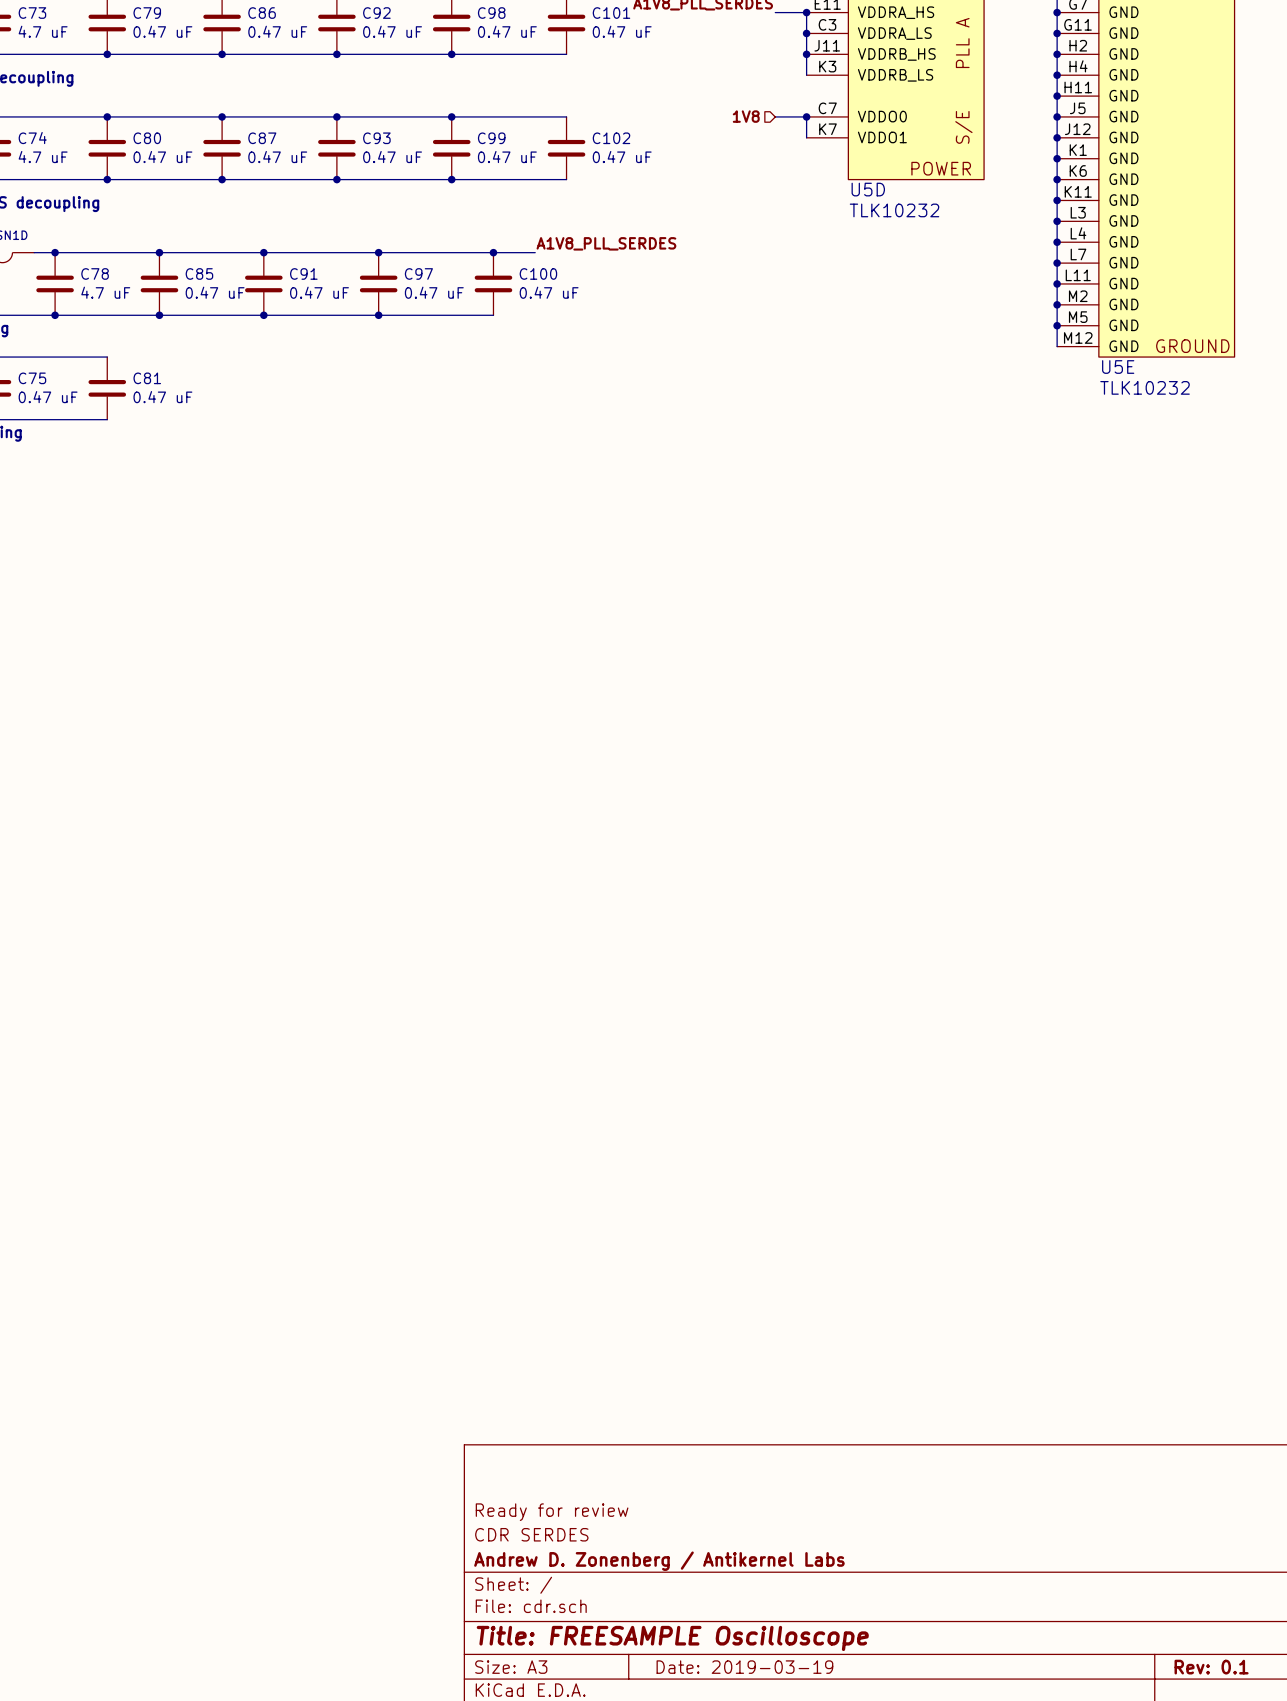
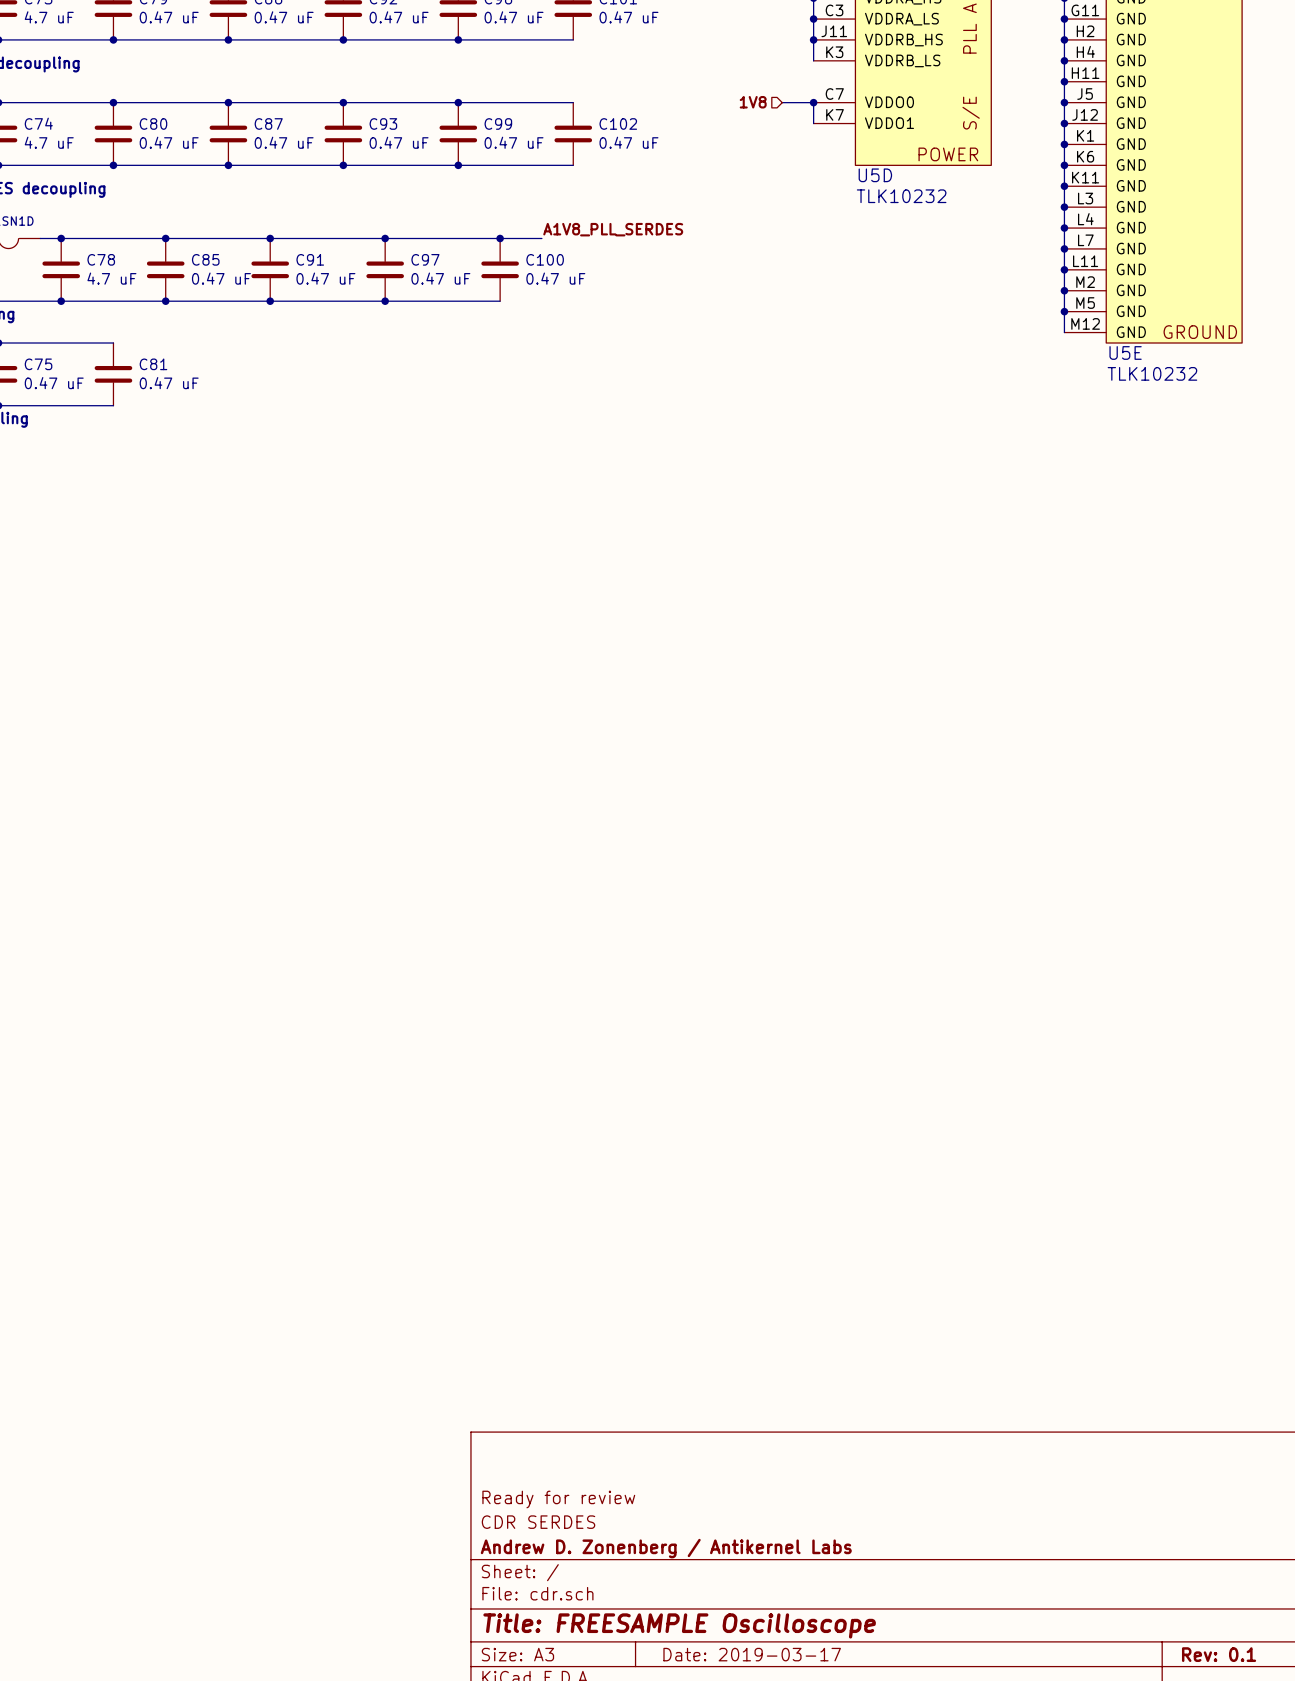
title block: Date: 2019-03-19 (744, 1667) -> Date: 2019-03-17 (752, 1654)

